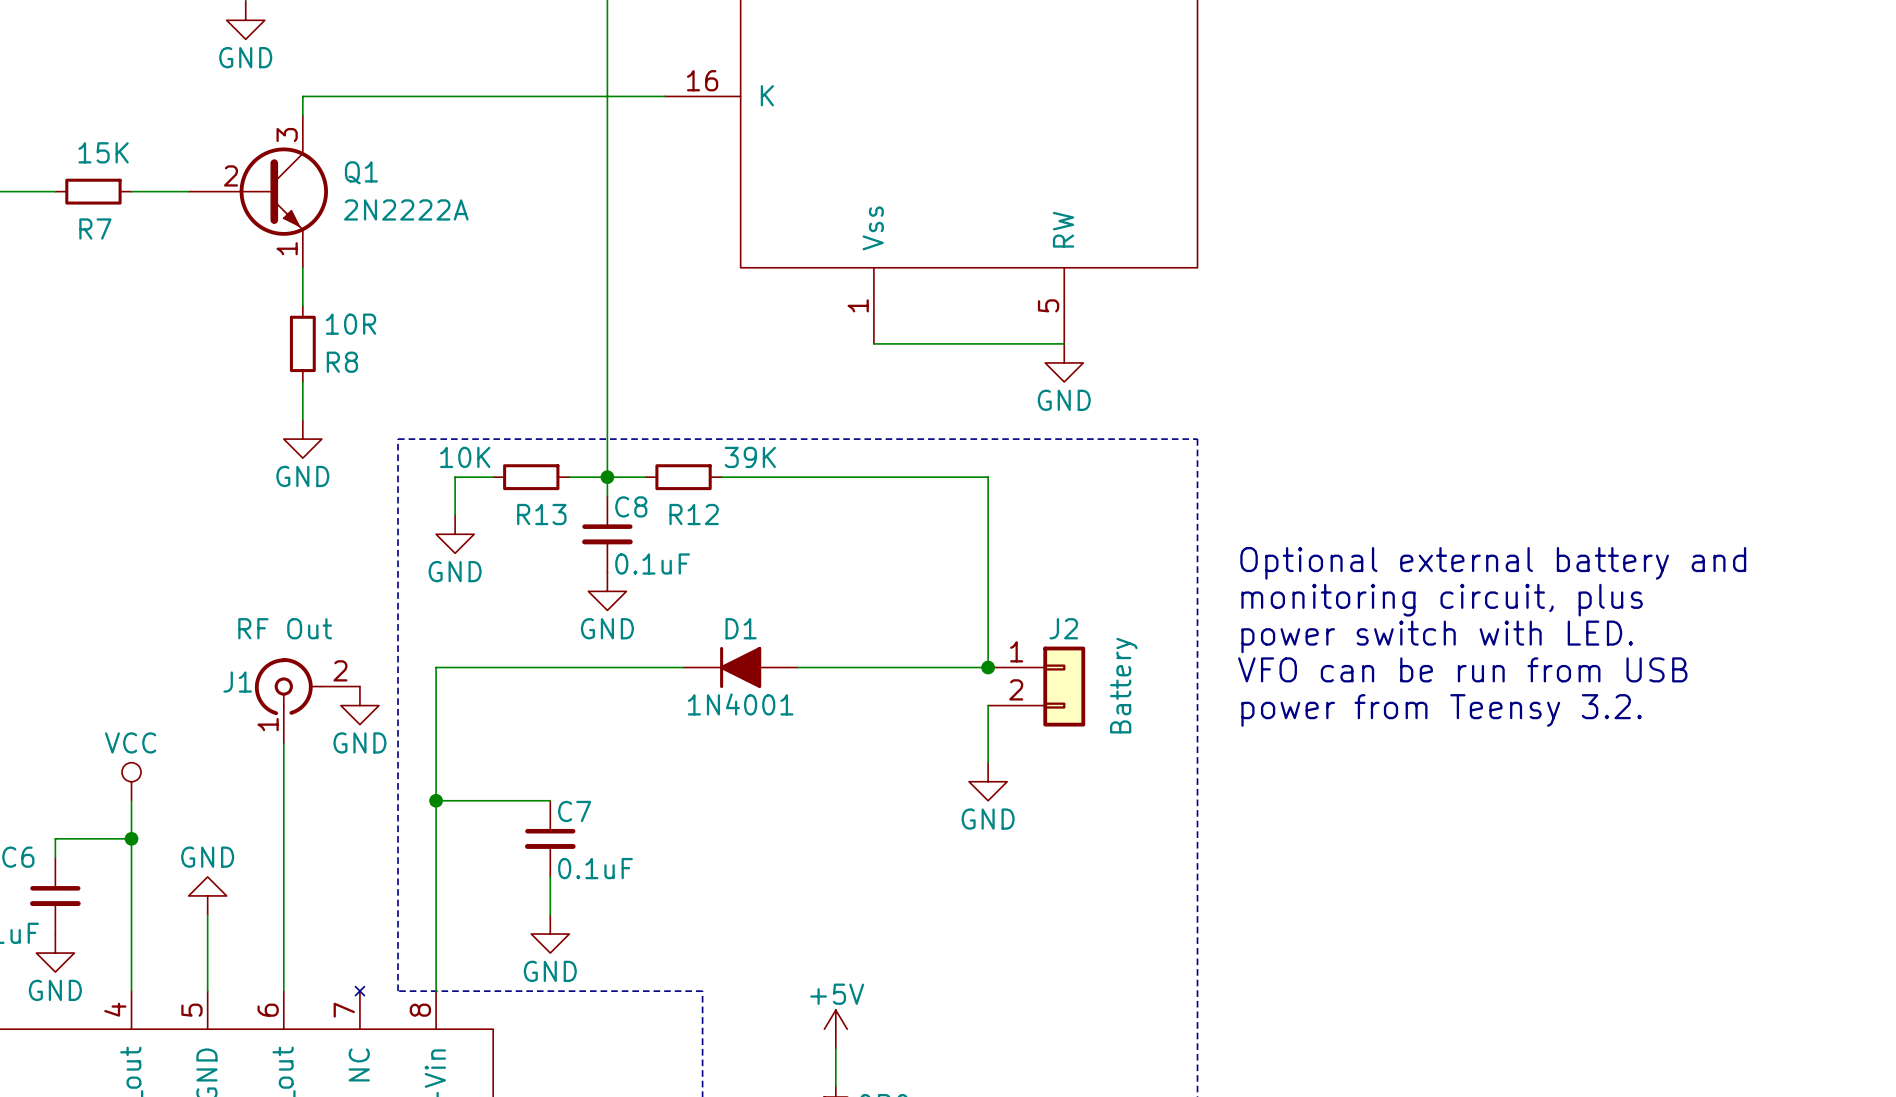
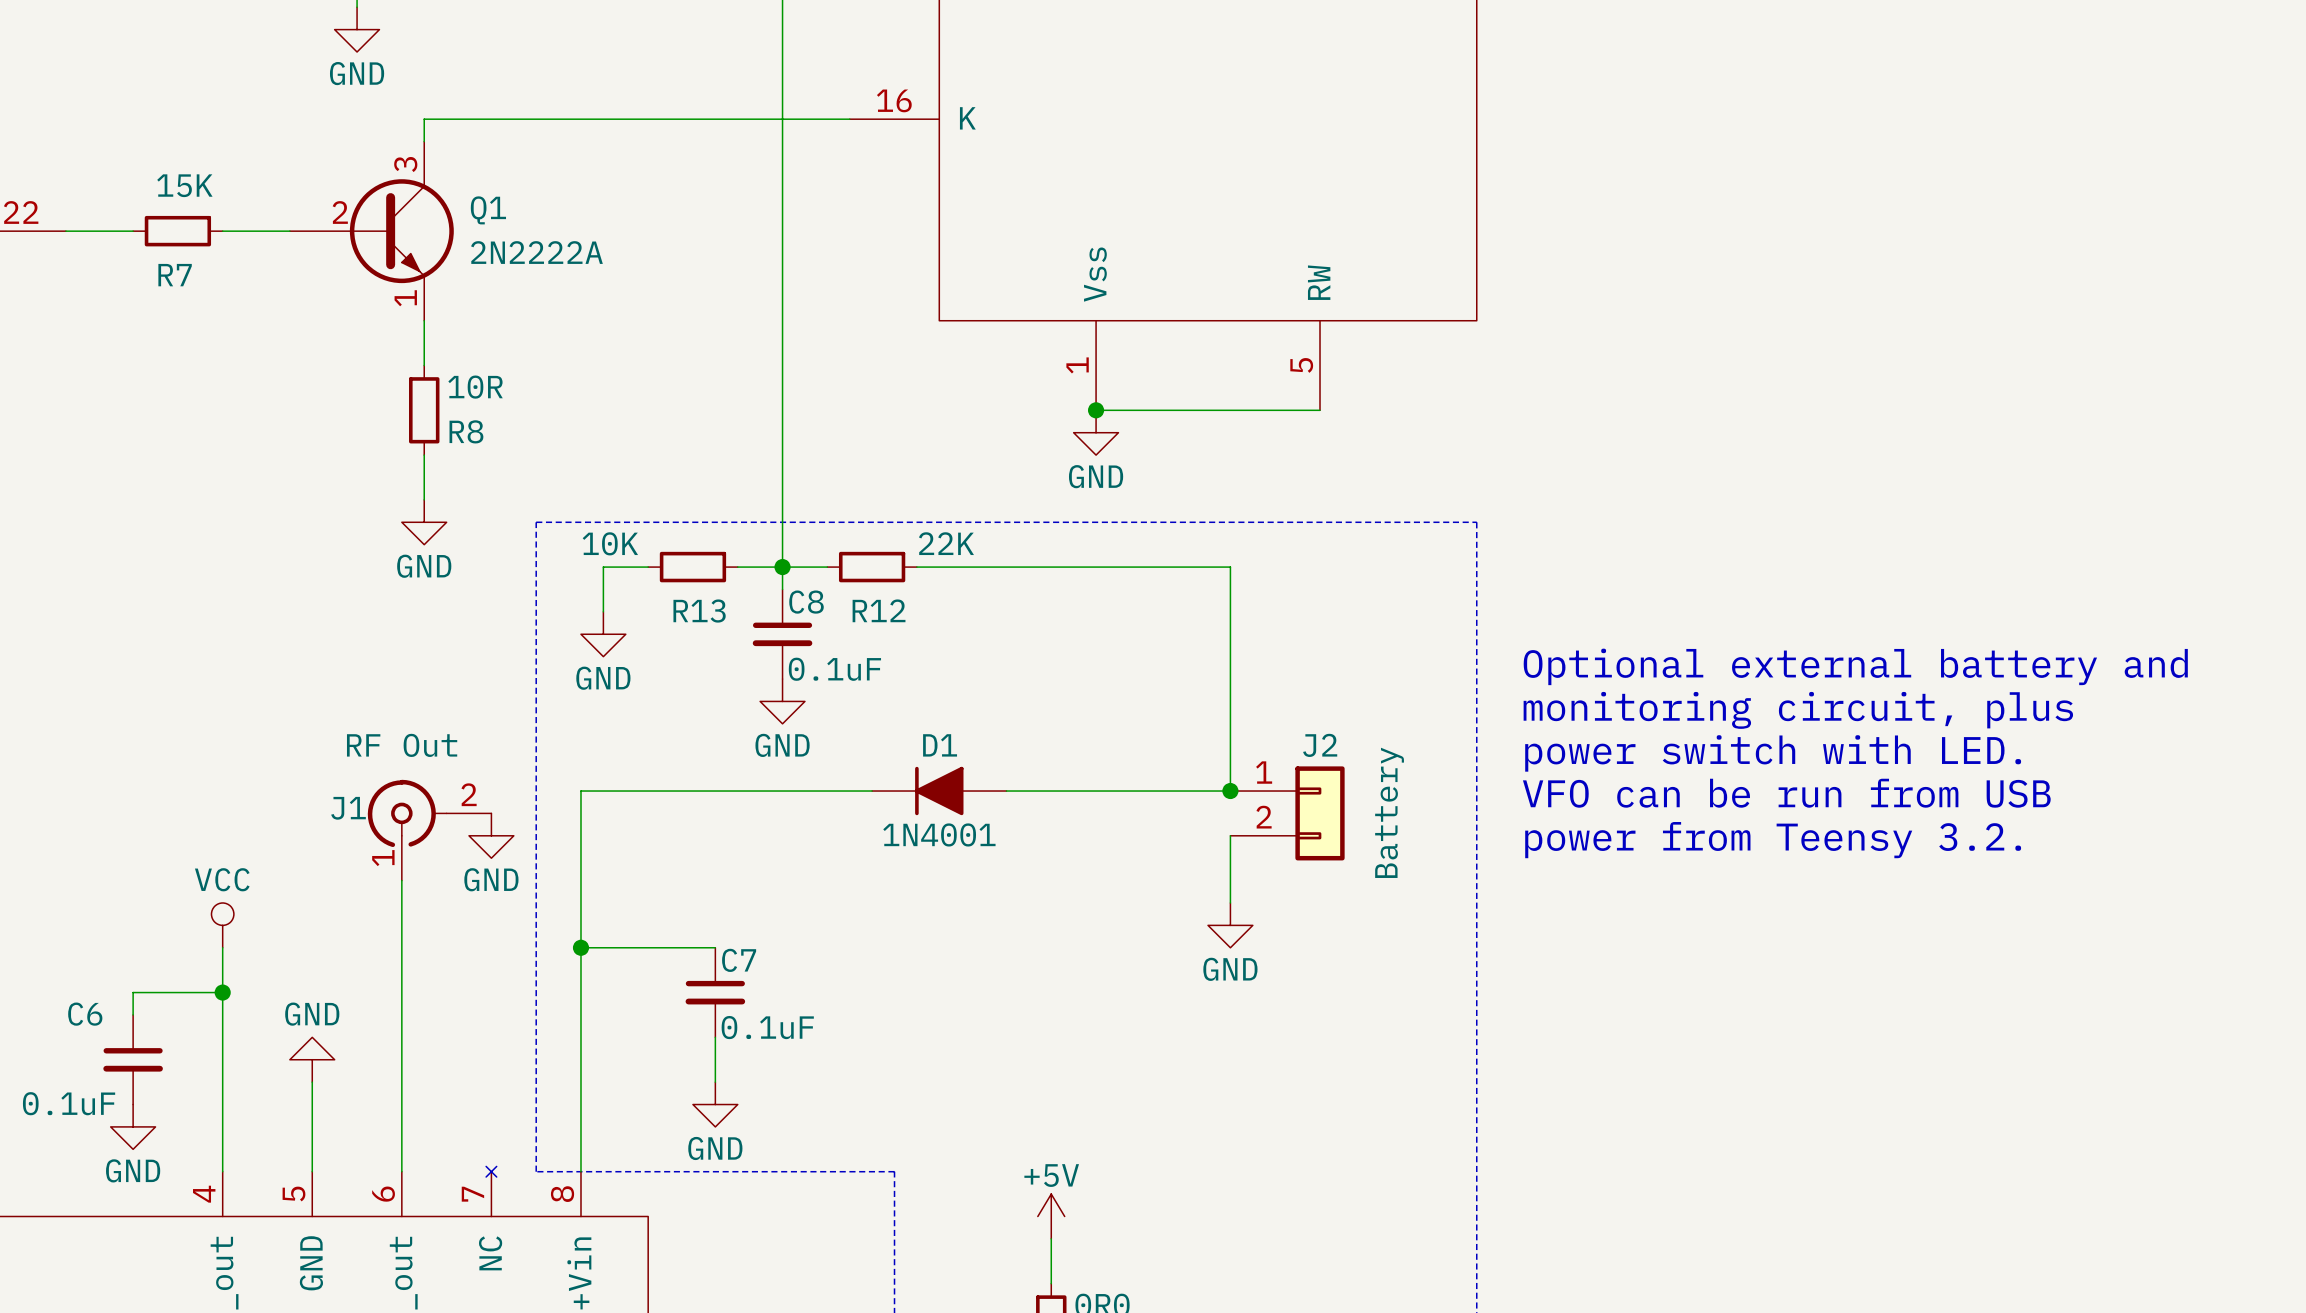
junction: none -> (1096, 410)
power symbol position: GND (1064, 362) -> GND (1096, 432)
R12 value: 39K (750, 457) -> 22K (946, 543)

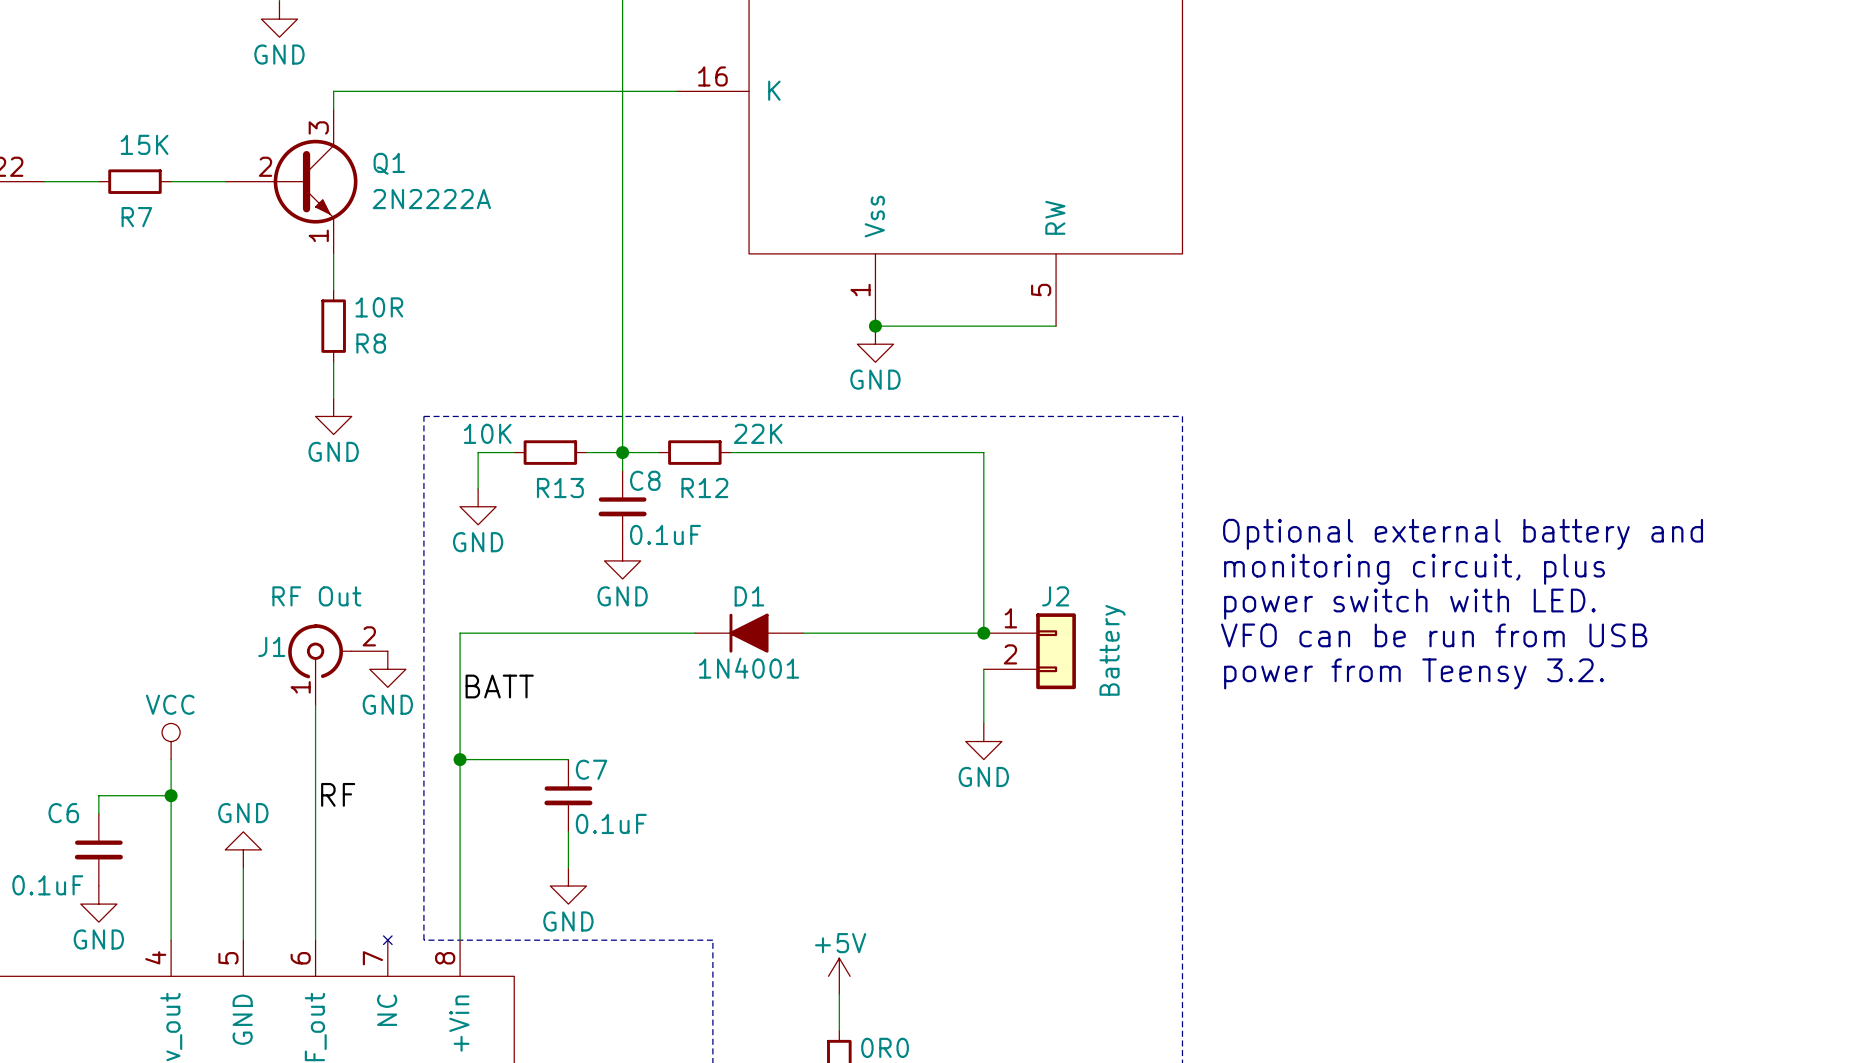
label: none -> BATT (499, 686)
label: none -> RF (338, 794)

